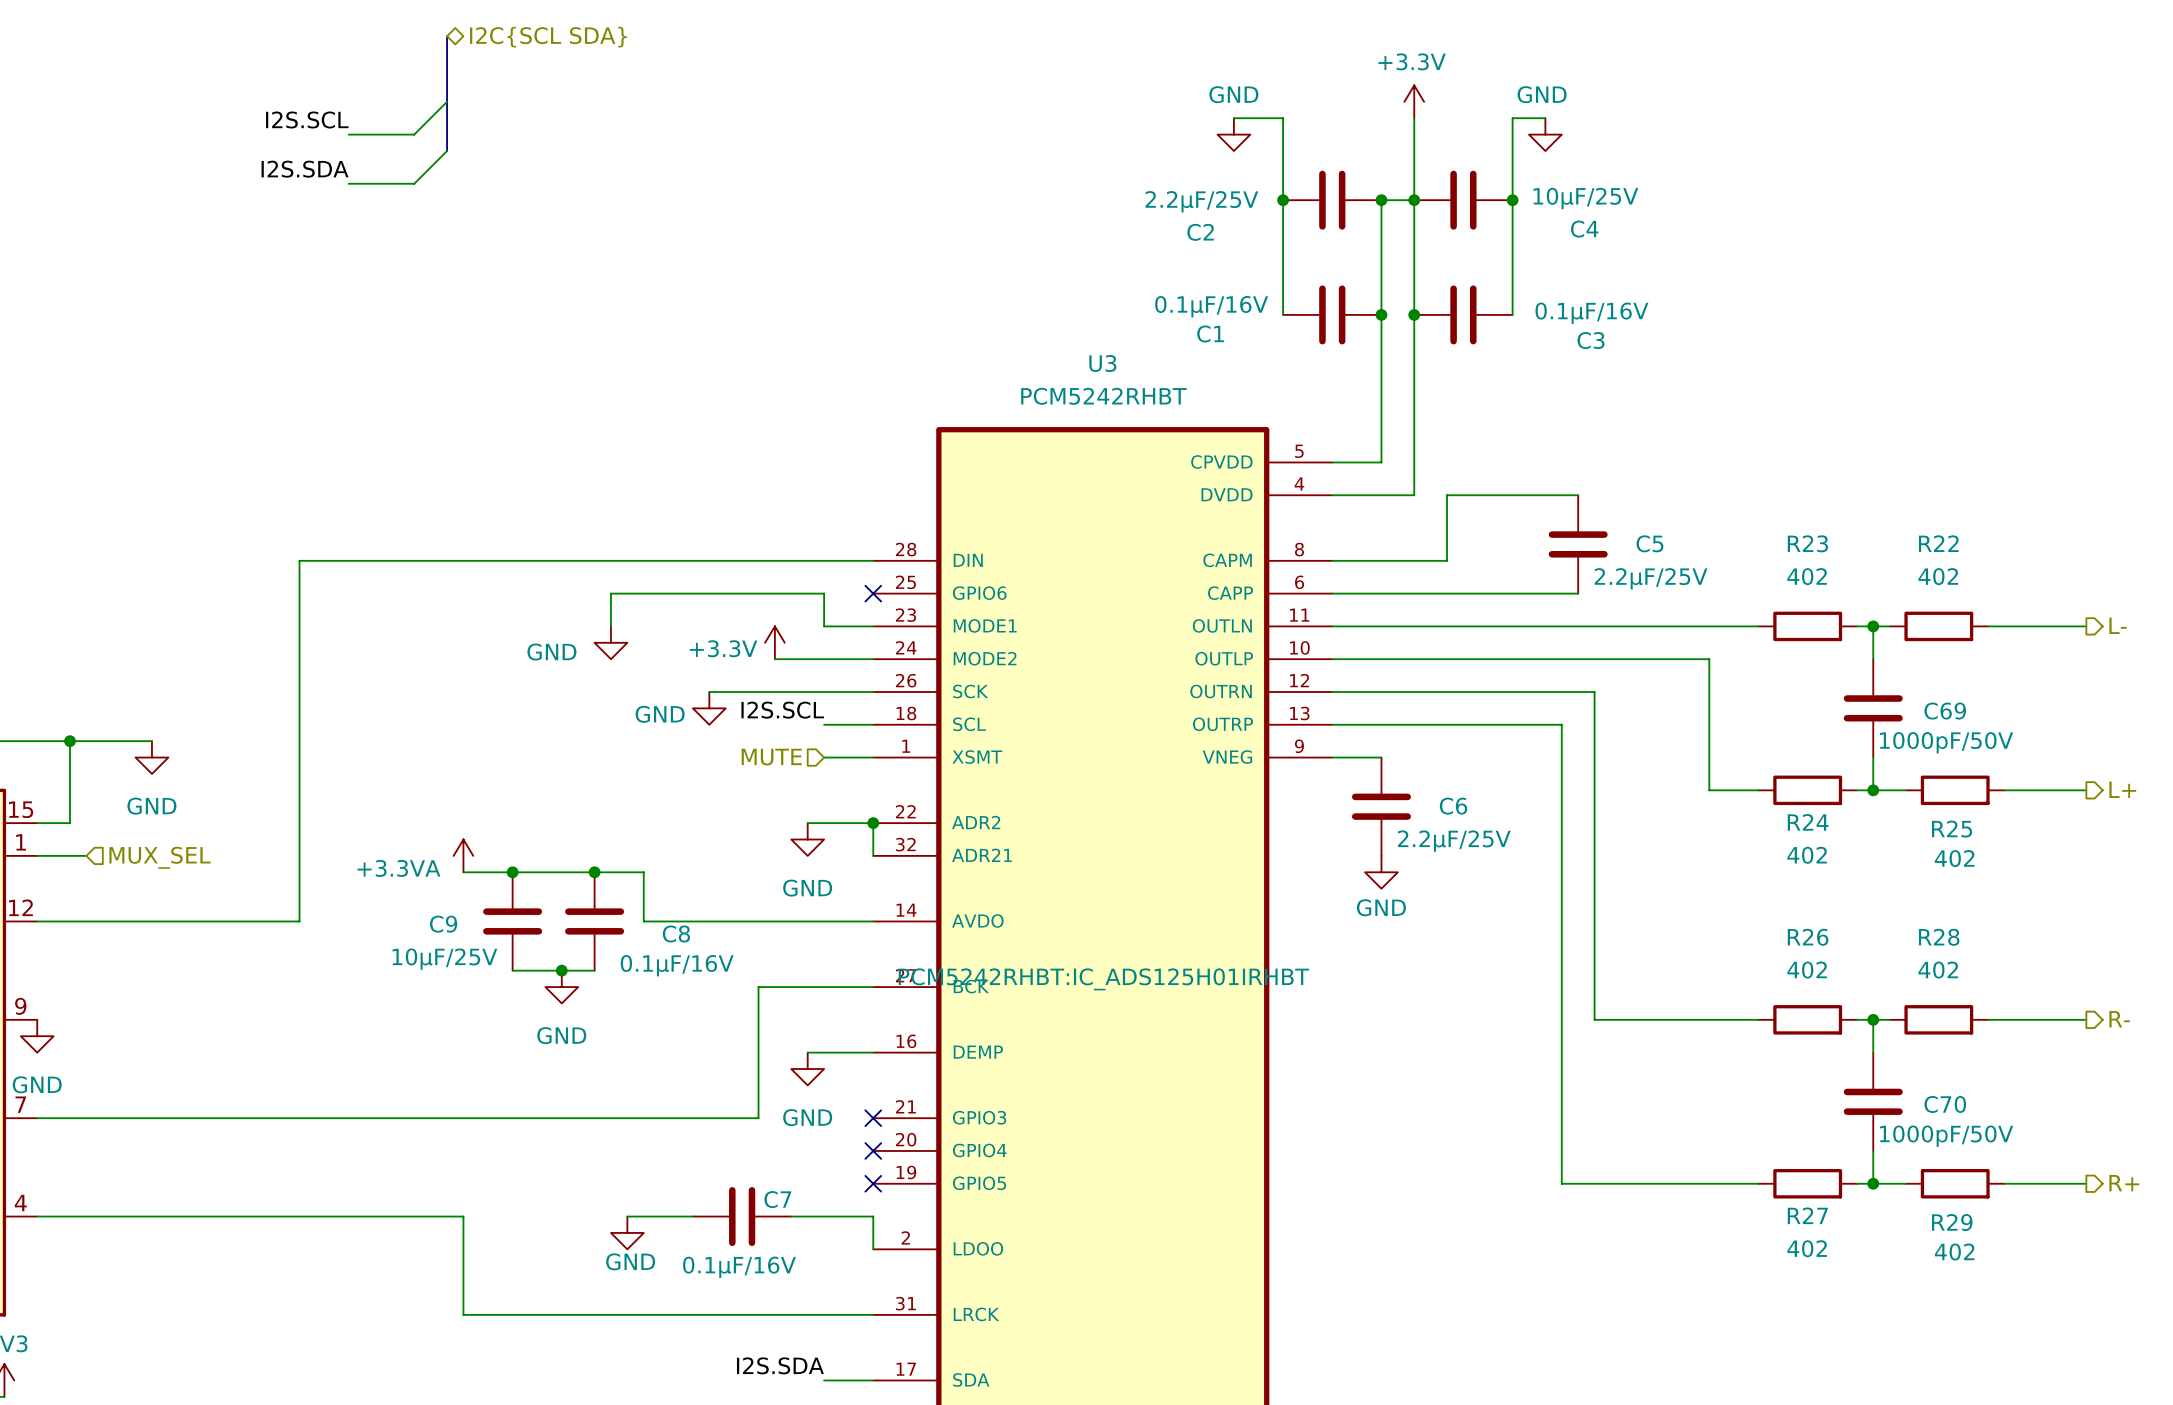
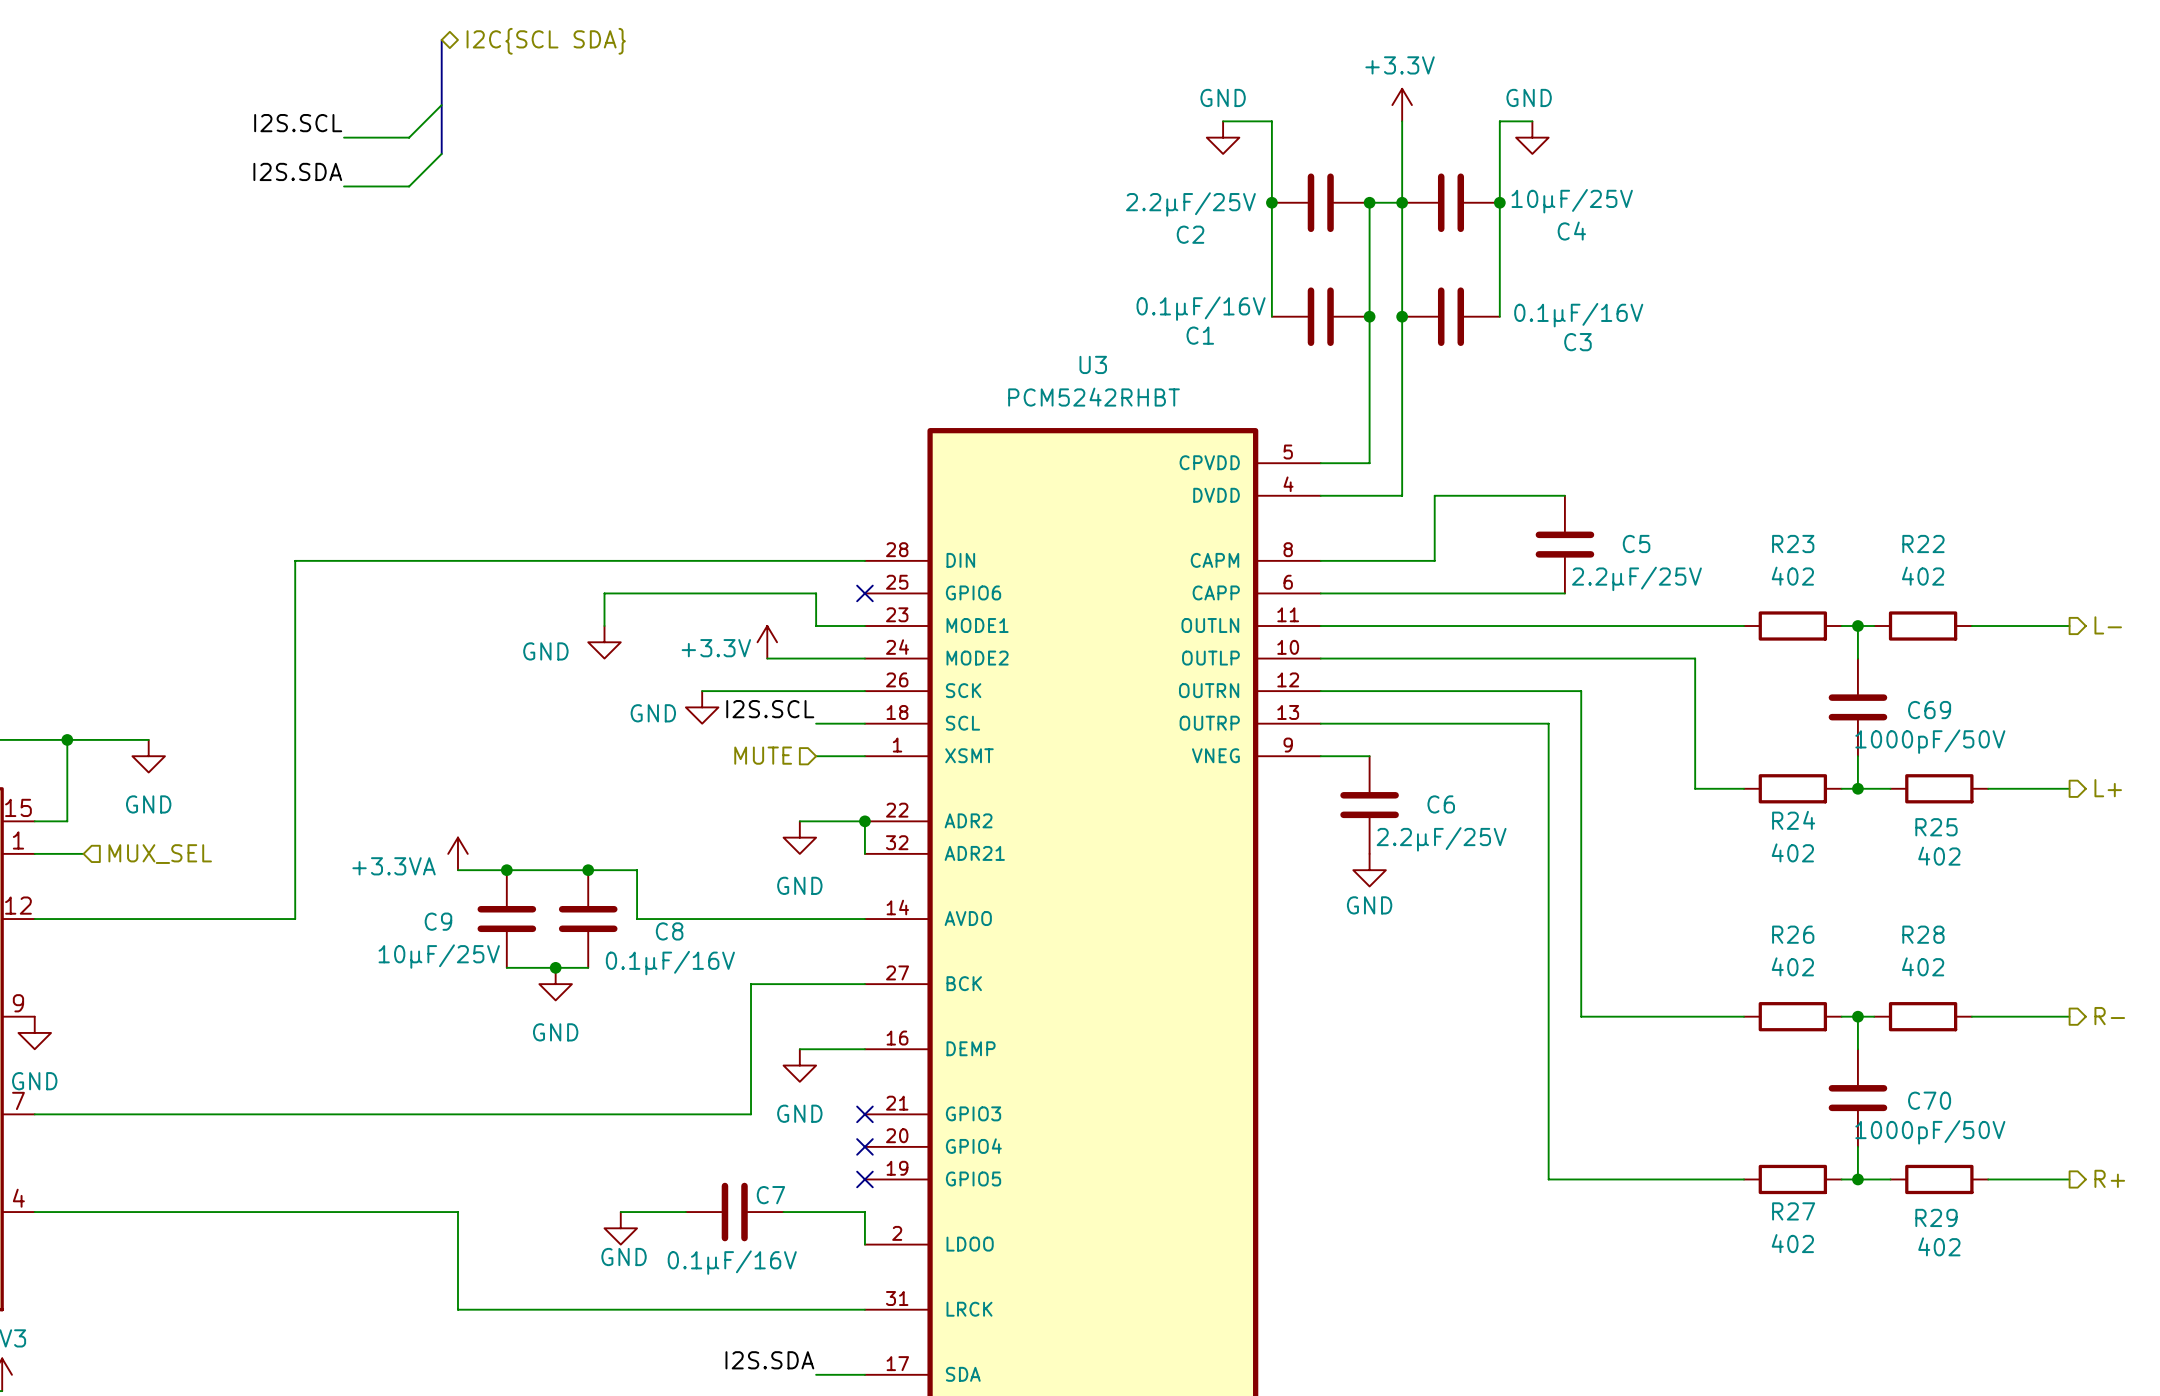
U3 text: PCM5242RHBT:IC_ADS125H01IRHBT (1103, 979) -> none

